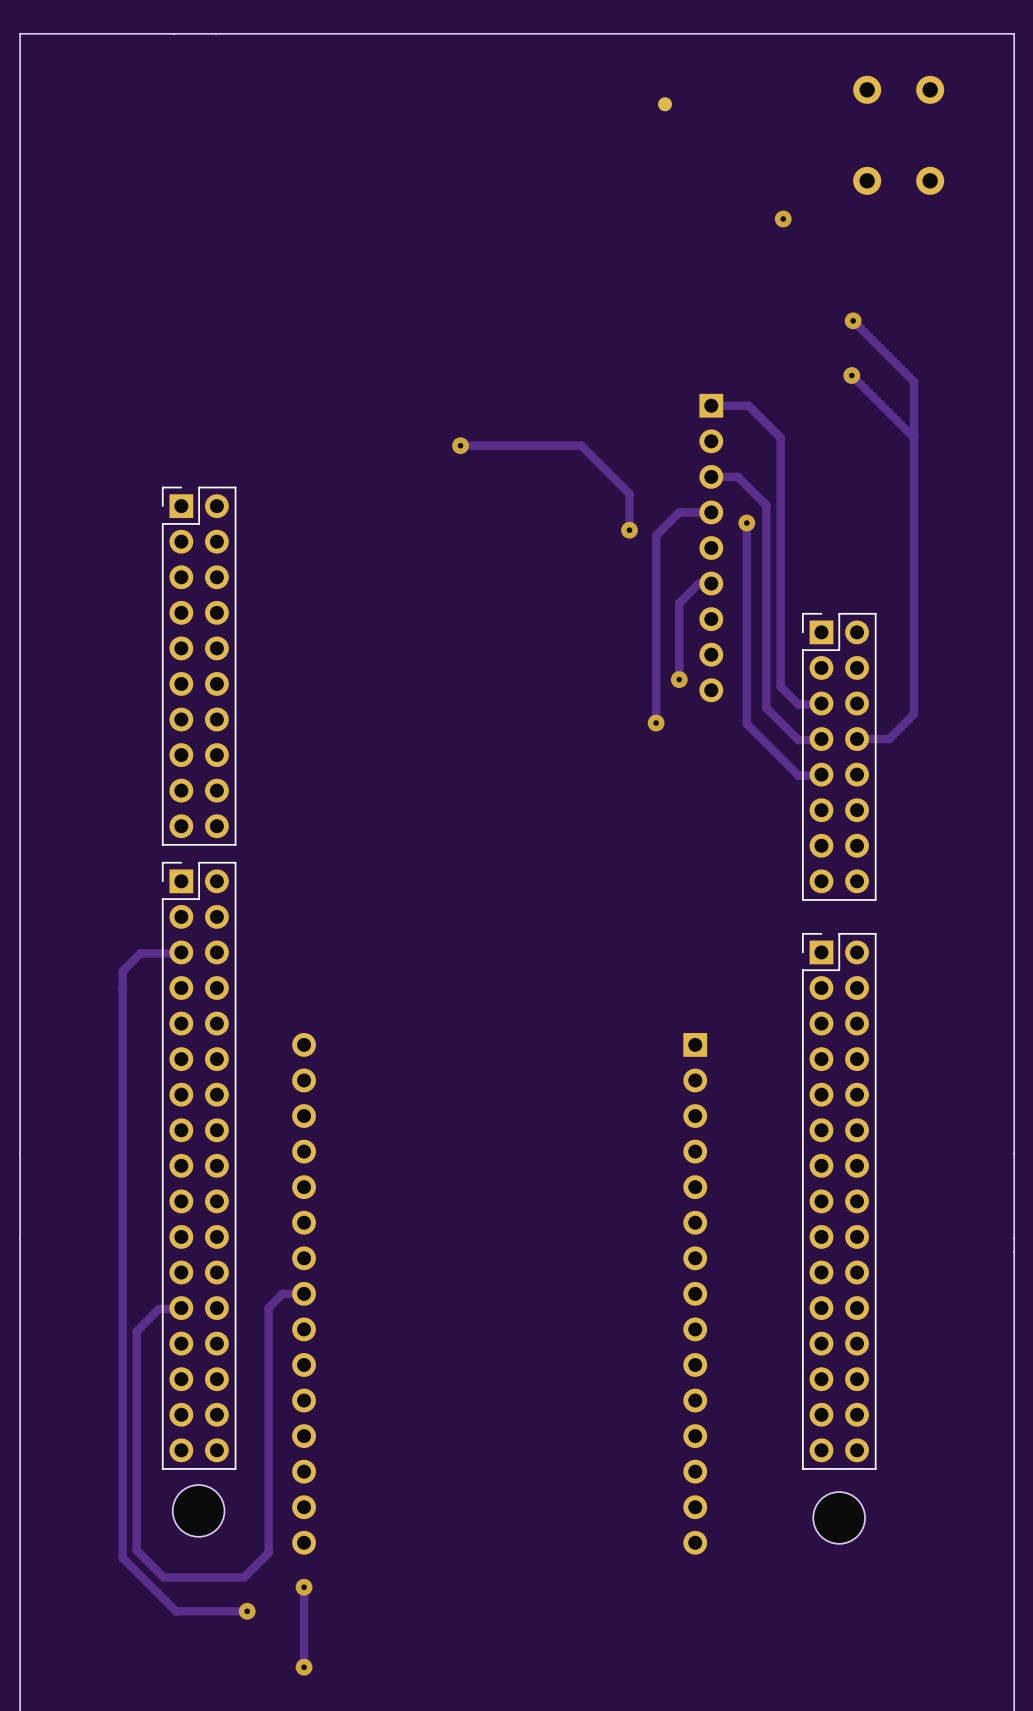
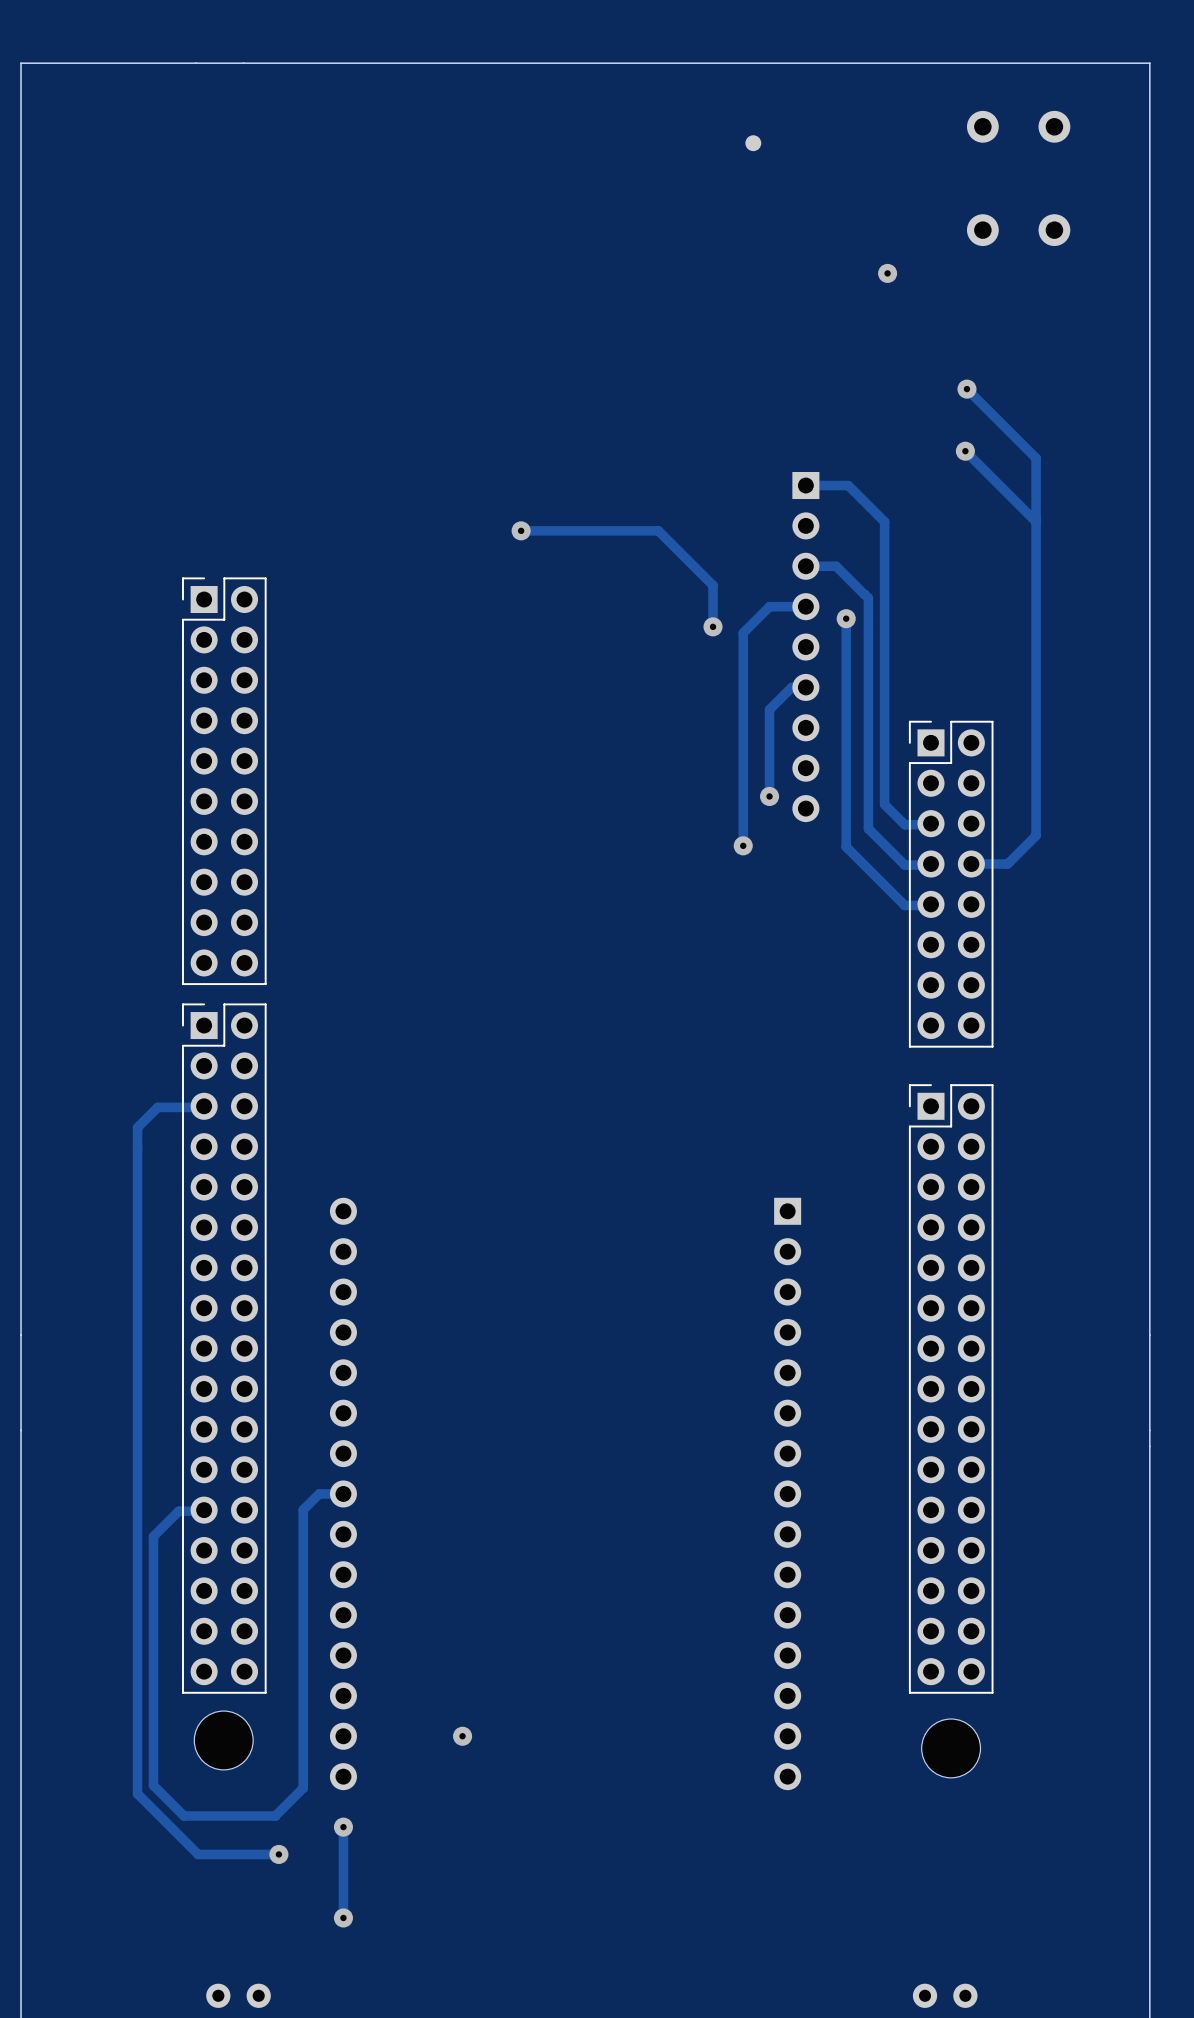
via: none -> (462, 1736)

